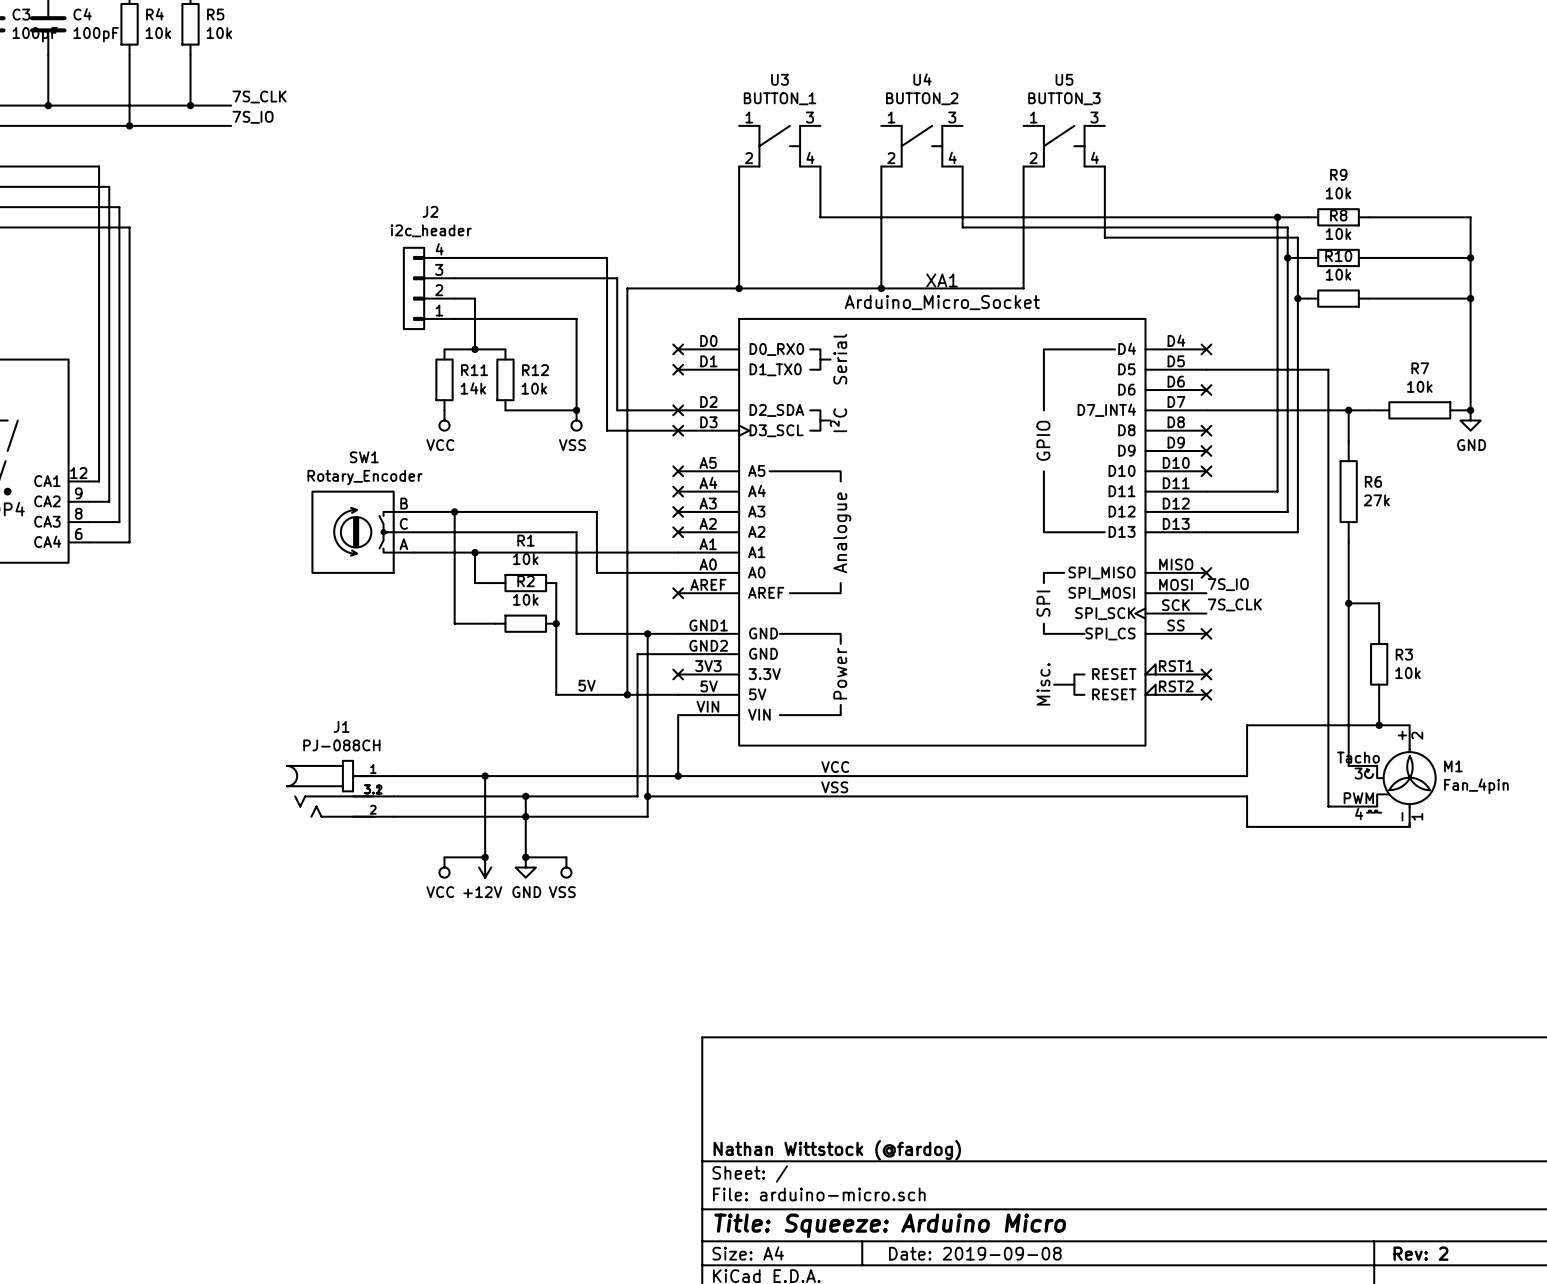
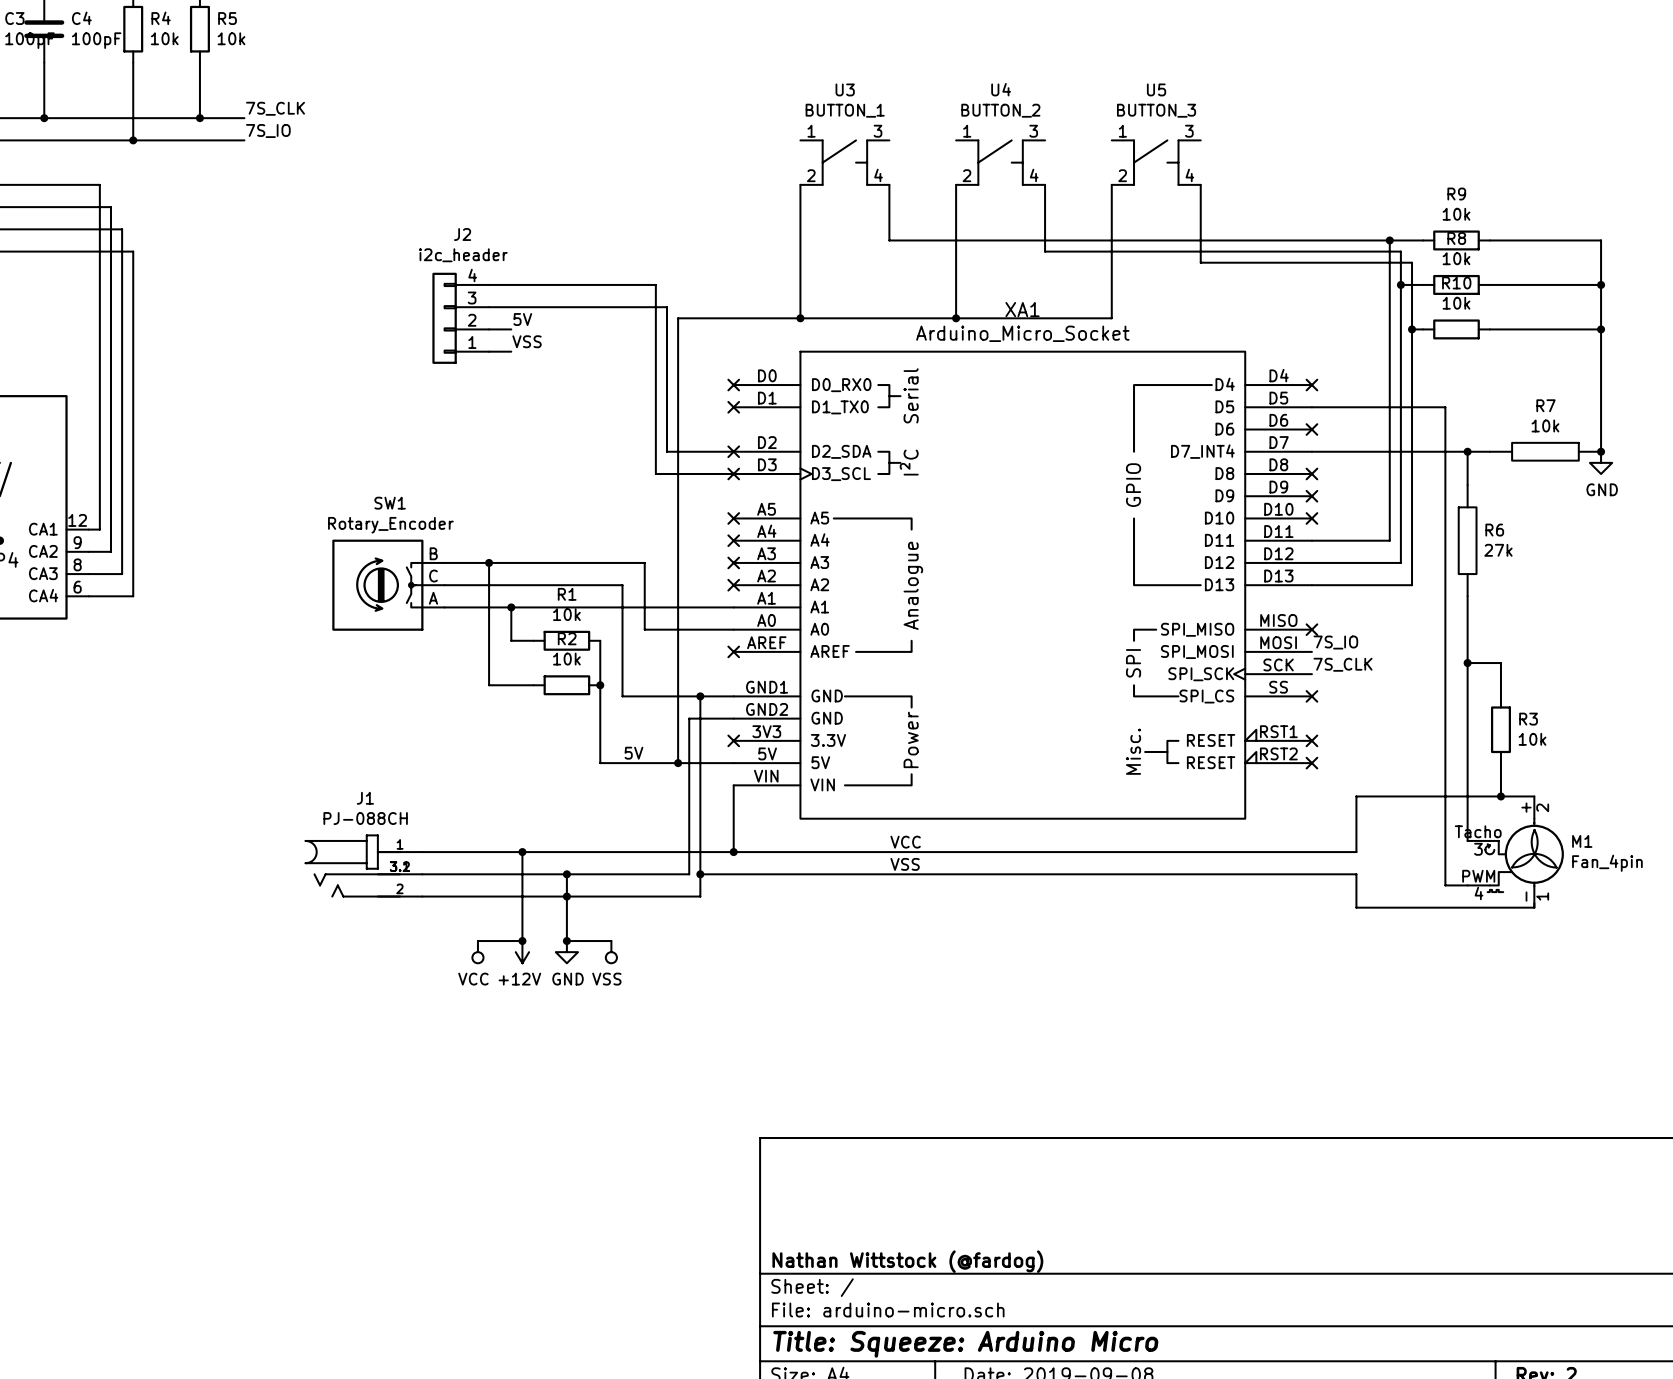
label: none -> 5V (522, 319)
wire: (474, 298) (474, 349) -> none
label: none -> VSS (527, 341)
wire: (474, 318) (576, 318) (576, 410) (505, 410) -> none
wire: (444, 349) (505, 349) -> none
junction: (474, 349) -> none
R11: 14k (444, 379) -> none
R12: 10k (505, 379) -> none
junction: (576, 410) -> none
power symbol: VCC (444, 420) -> none
power symbol: VSS (576, 420) -> none

